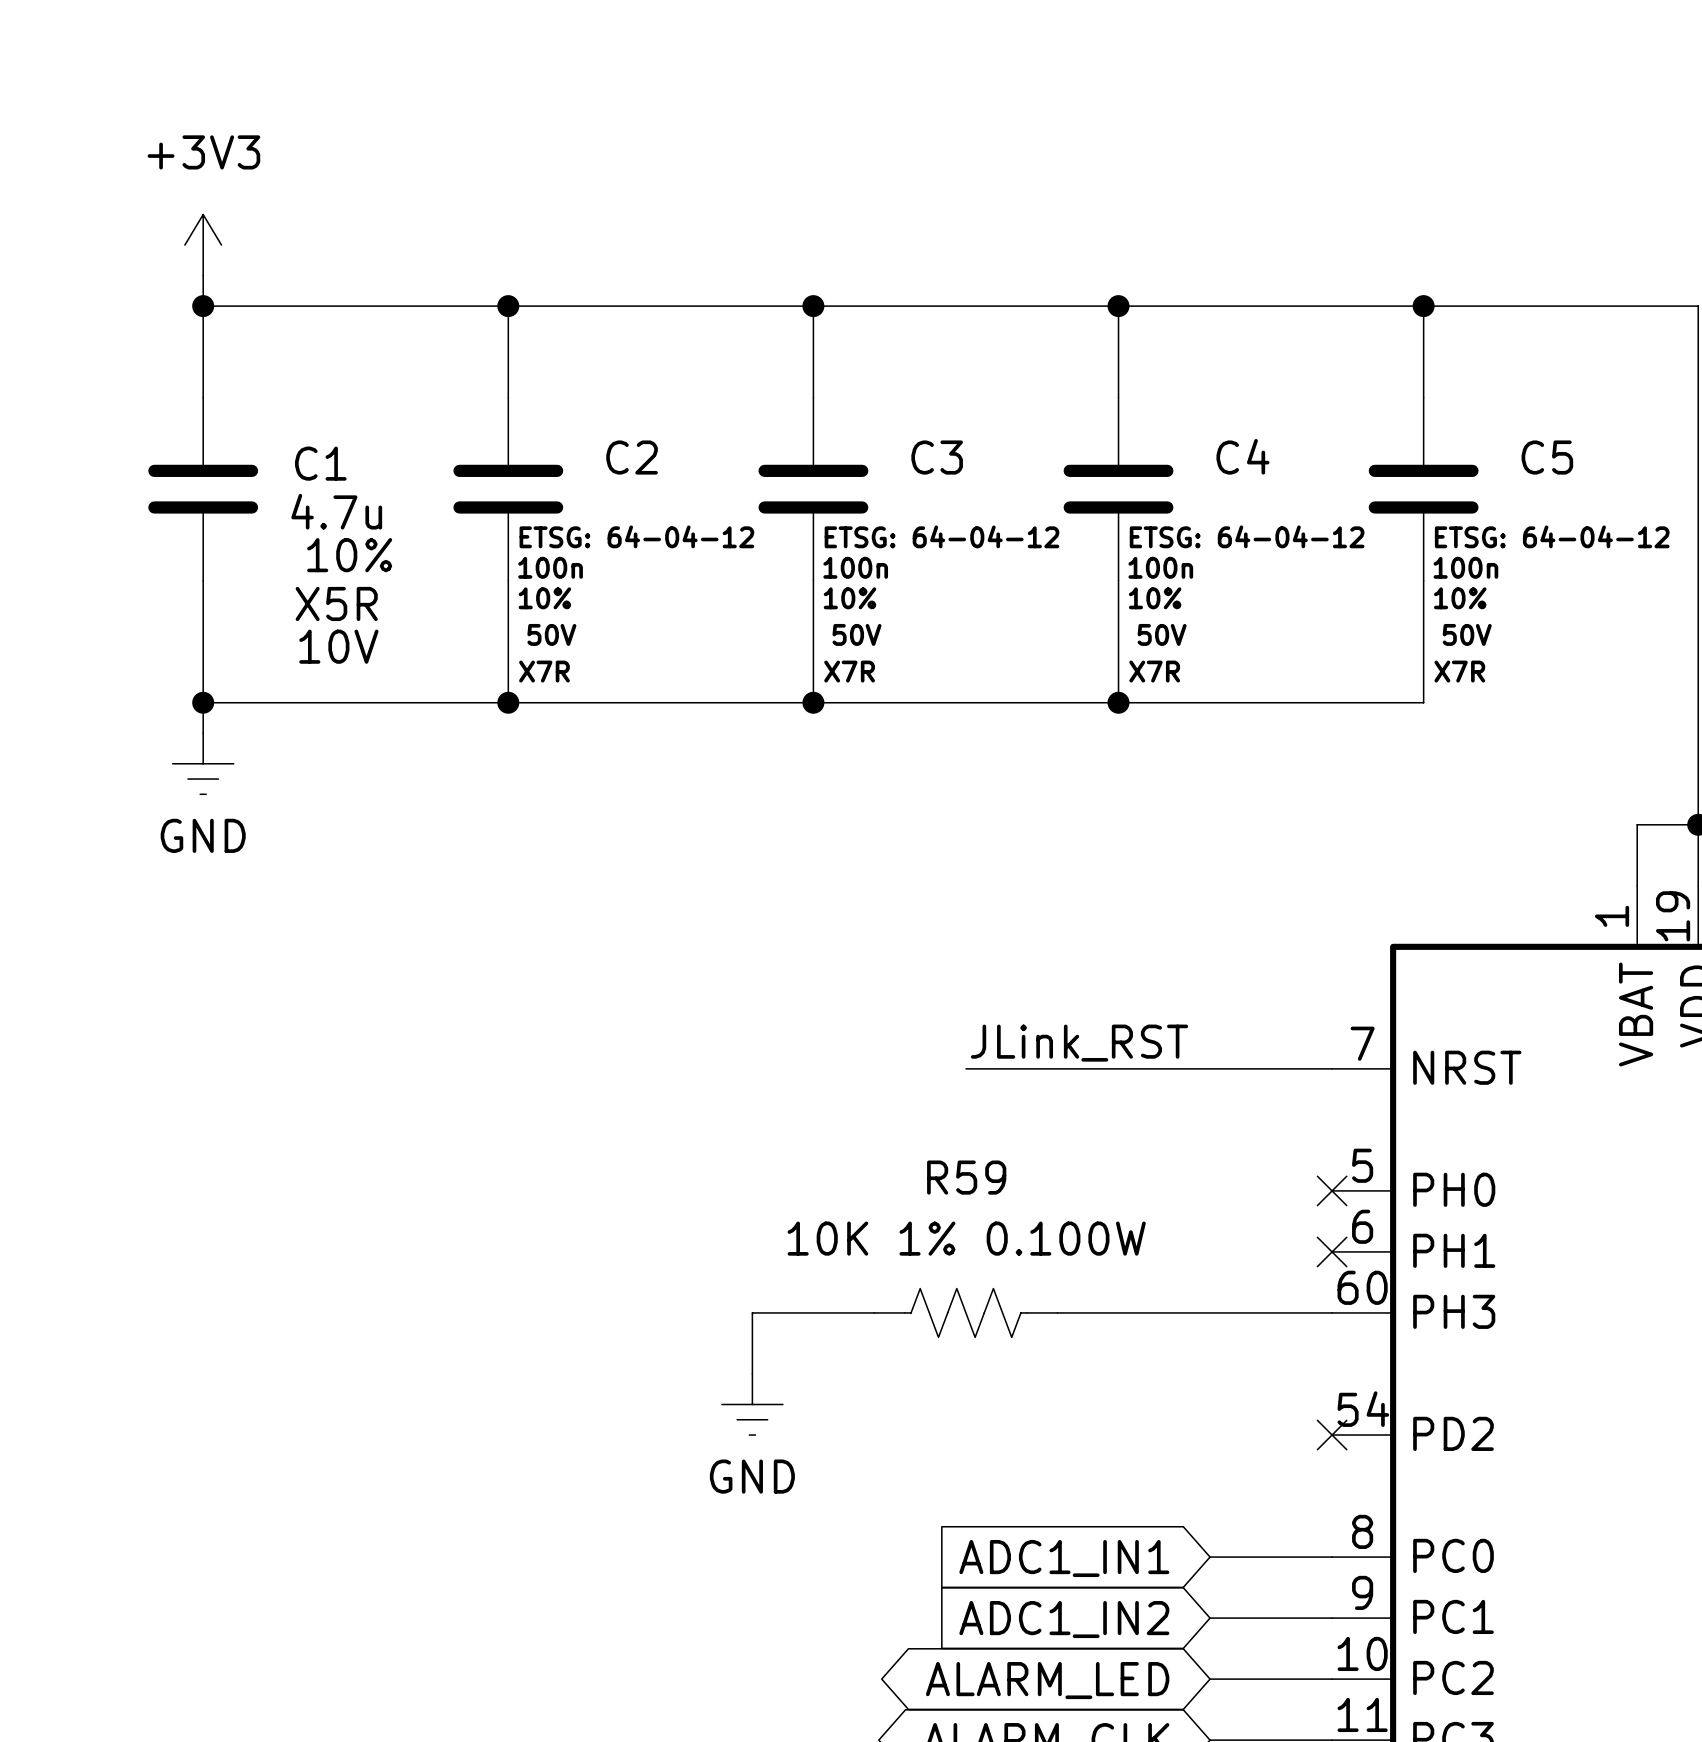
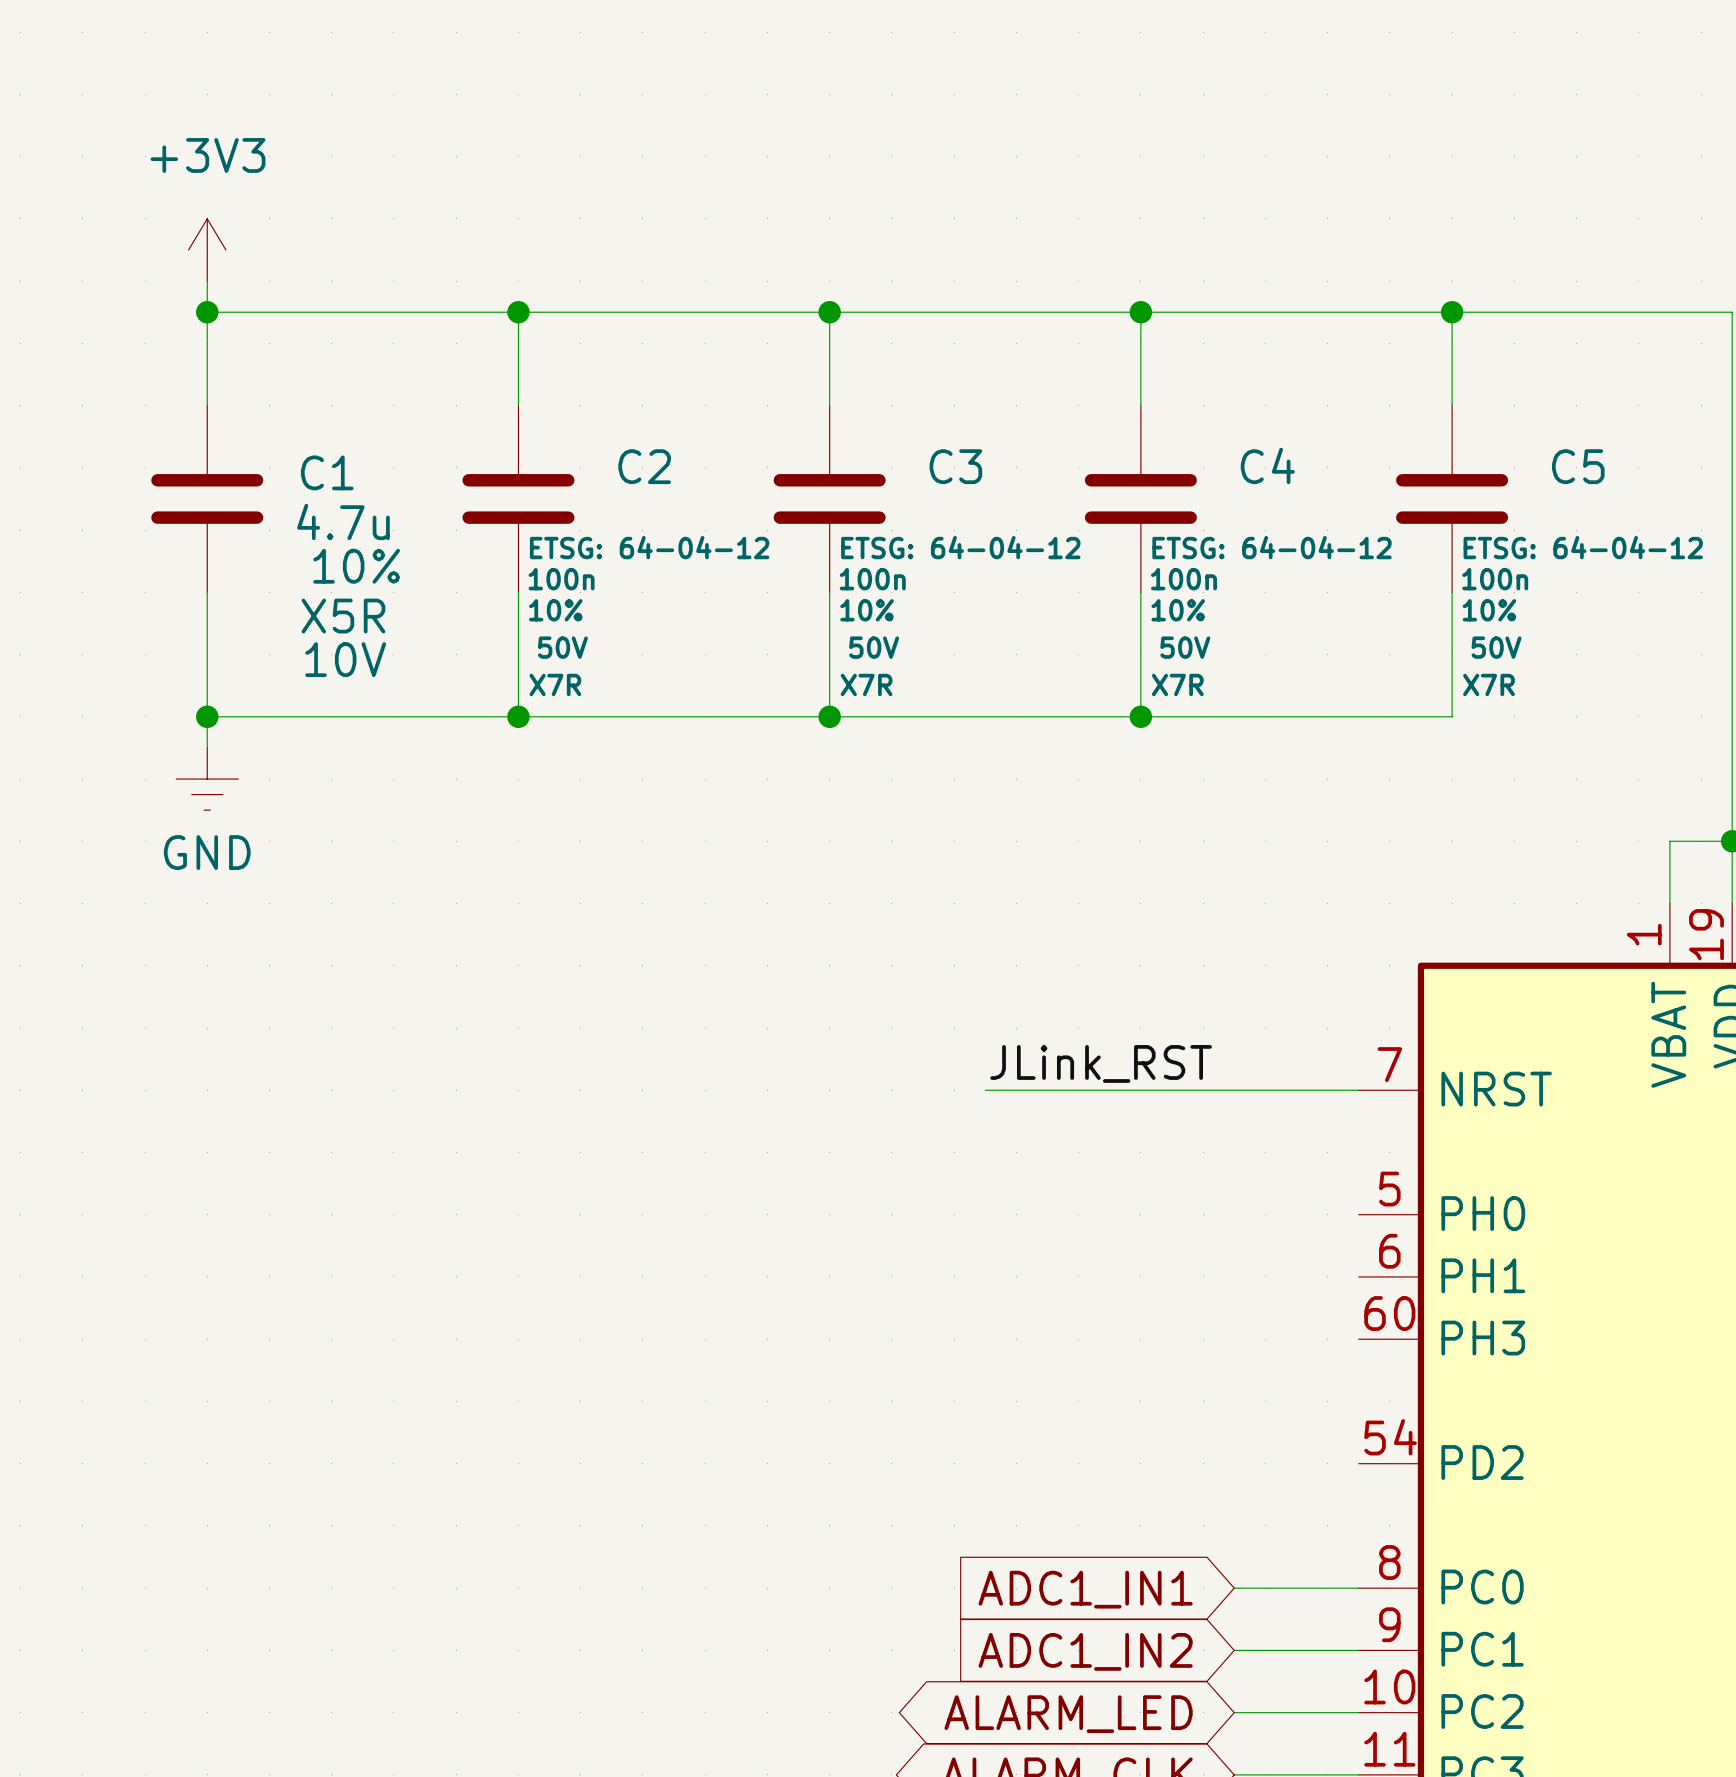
no-connect mark: (1332, 1190) -> none
no-connect mark: (1332, 1251) -> none
wire: (874, 1312) (752, 1312) (752, 1373) -> none
R59: 10K 1% 0.100W (965, 1312) -> none
wire: (1057, 1312) (1332, 1312) -> none
power symbol: GND (752, 1404) -> none
no-connect mark: (1332, 1435) -> none

